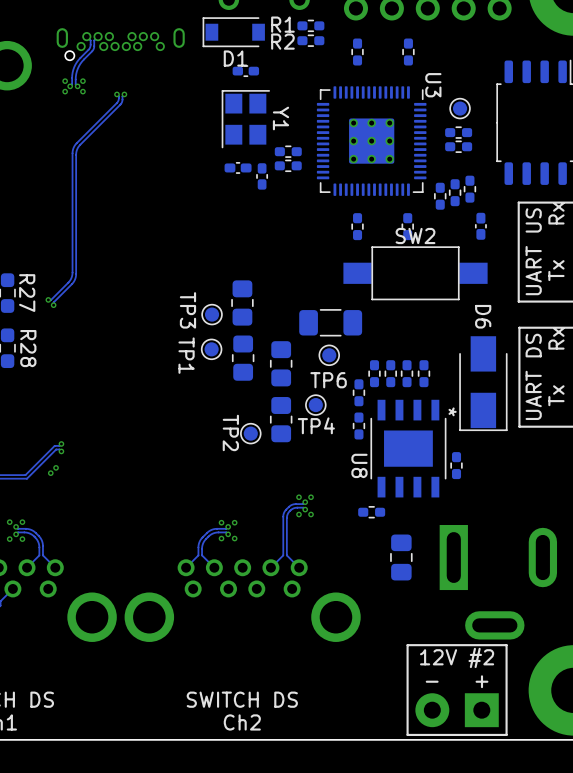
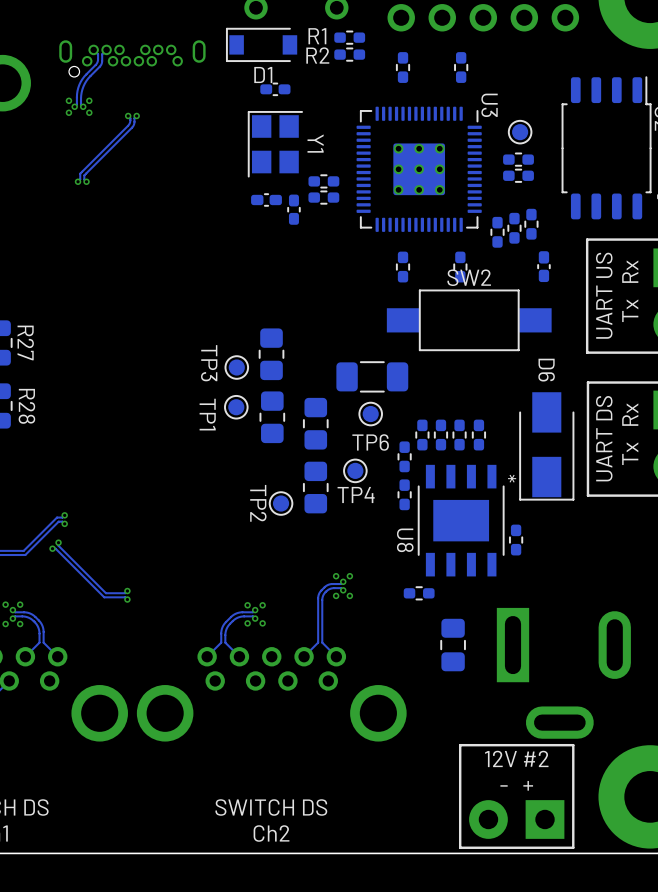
track: (76, 143) (72, 153) (72, 275) (68, 282) (51, 299) (48, 299) -> (82, 171) (78, 181)
track: (80, 144) (76, 154) (75, 276) (72, 283) (53, 302) (53, 305) -> (86, 173) (84, 179) (86, 181)
via: none -> (78, 181)
via: none -> (86, 181)
via: (48, 299) -> none
via: (53, 305) -> none
track: none -> (58, 542) (58, 545) (105, 593) (125, 593) (127, 591)
track: none -> (52, 548) (55, 548) (104, 597) (125, 597) (127, 599)
via: none -> (127, 591)
via: none -> (127, 599)

